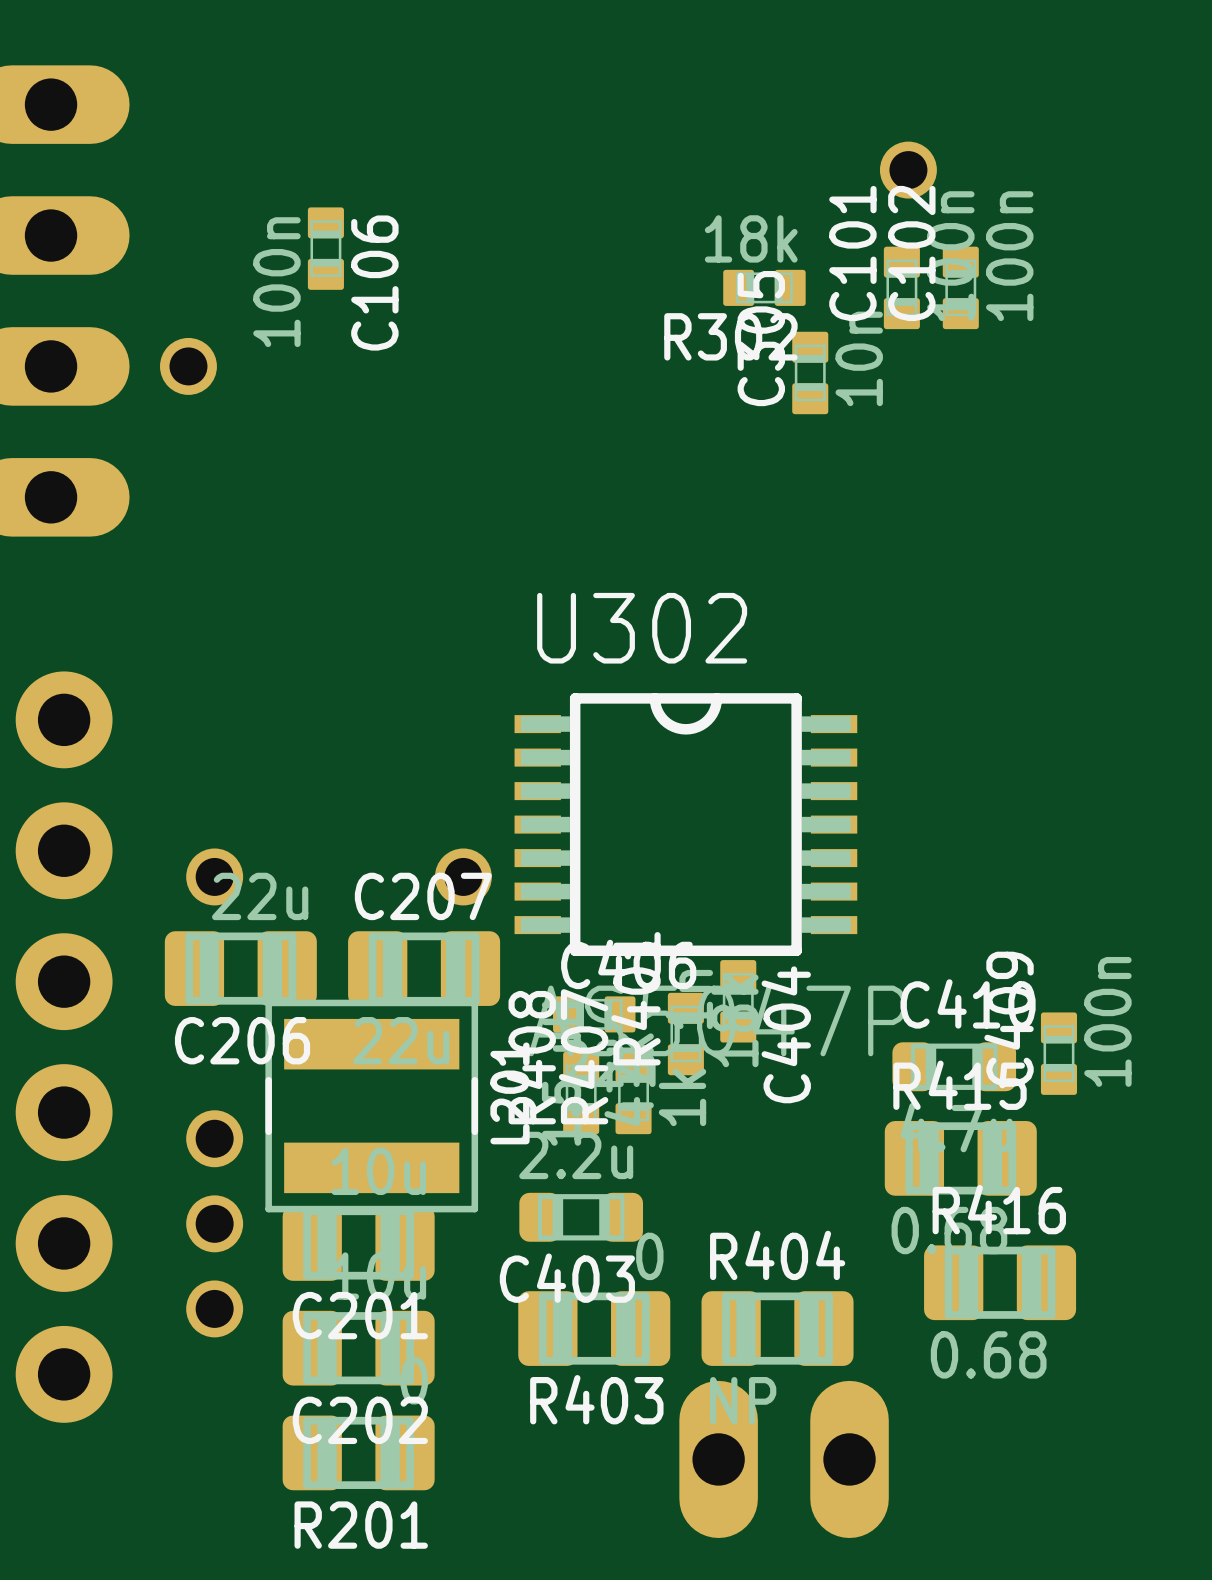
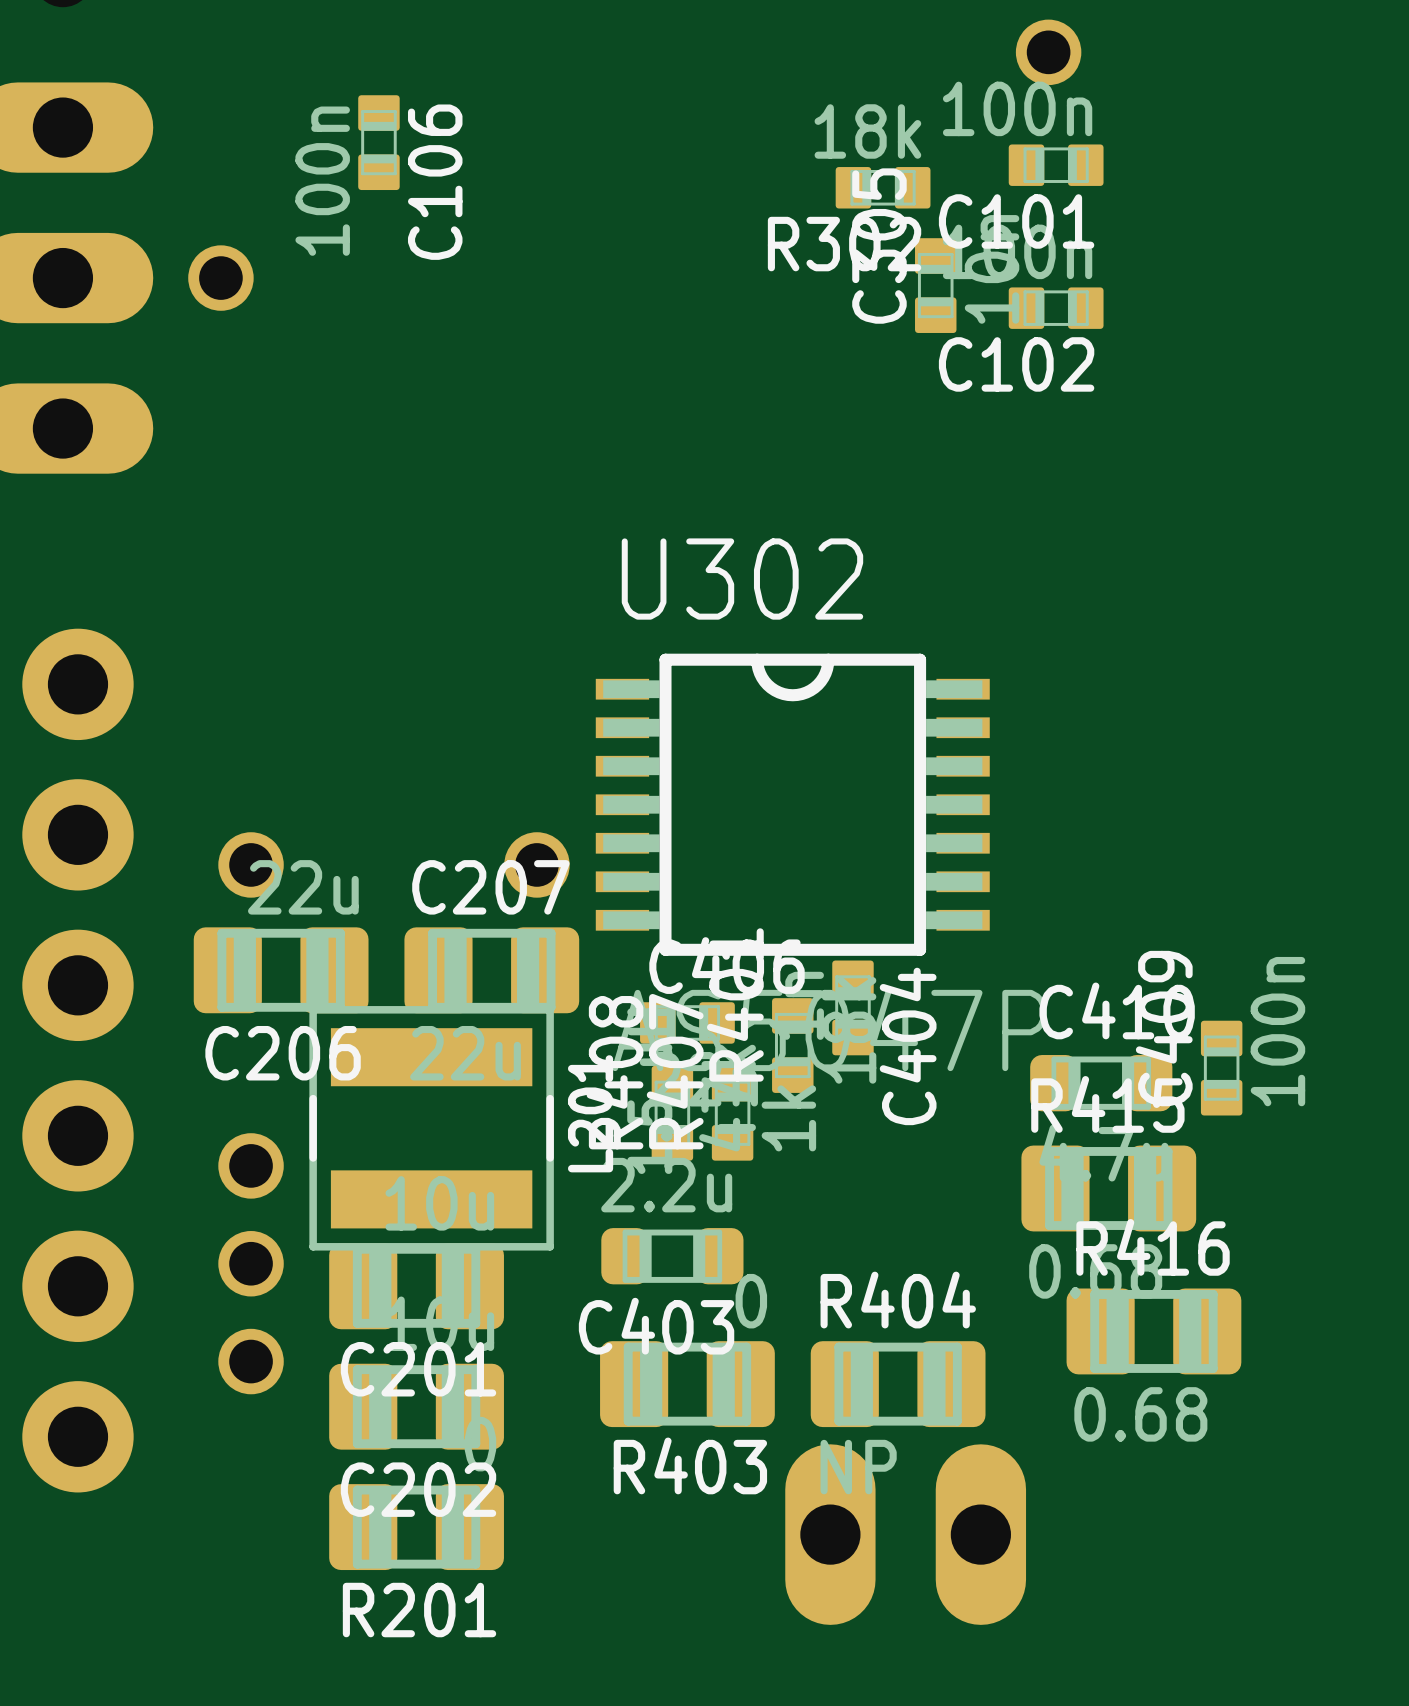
C101 rotation: 0° (901, 287) -> 90° clockwise (1056, 165)
C102 rotation: 0° (960, 287) -> 90° clockwise (1056, 308)
C102 position: (960, 287) -> (1056, 308)

